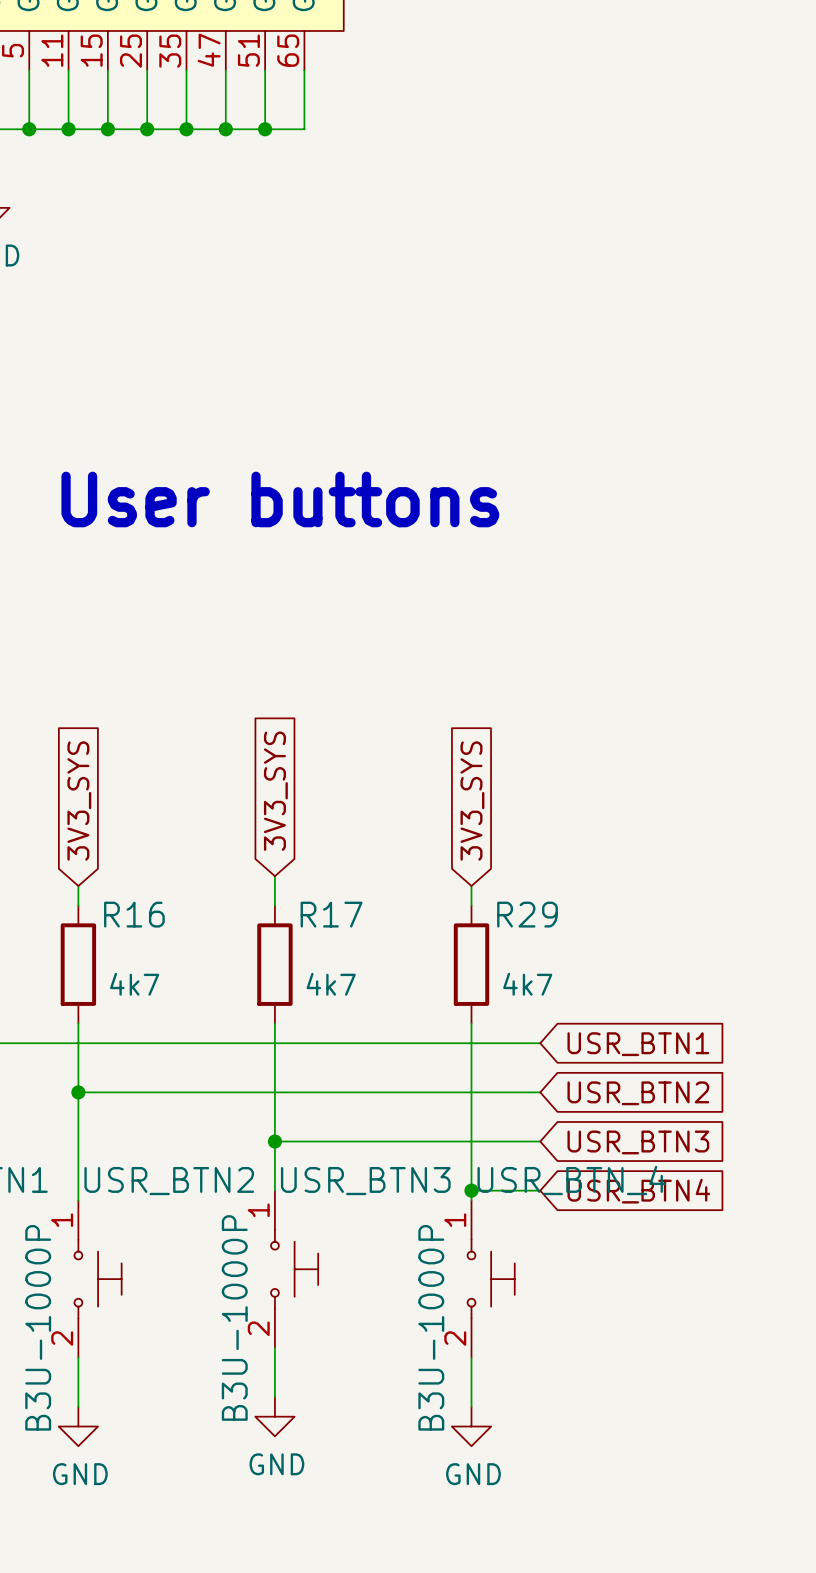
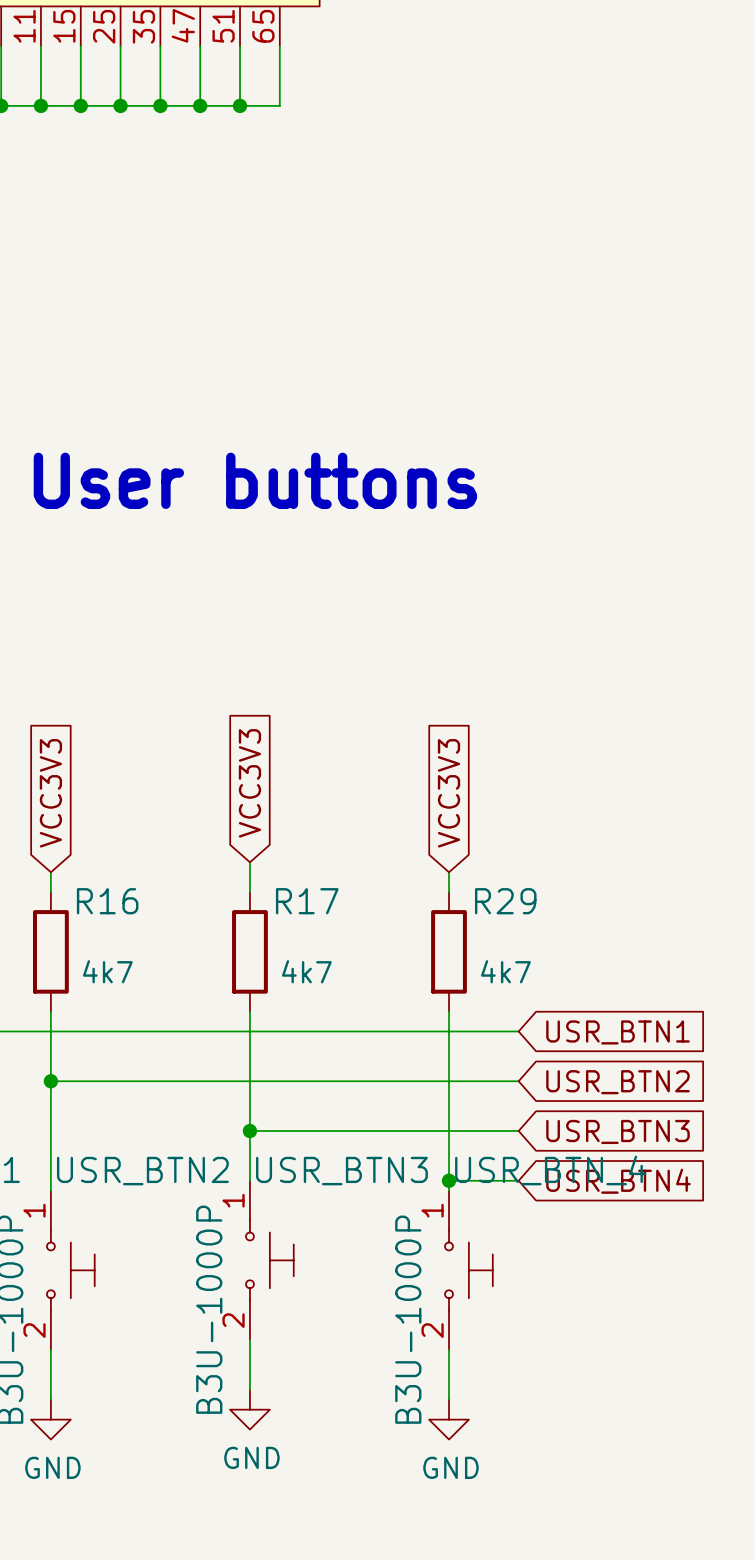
global label: 3V3_SYS (275, 791) -> VCC3V3 (249, 783)
global label: 3V3_SYS (79, 801) -> VCC3V3 (50, 793)
global label: 3V3_SYS (472, 801) -> VCC3V3 (449, 793)

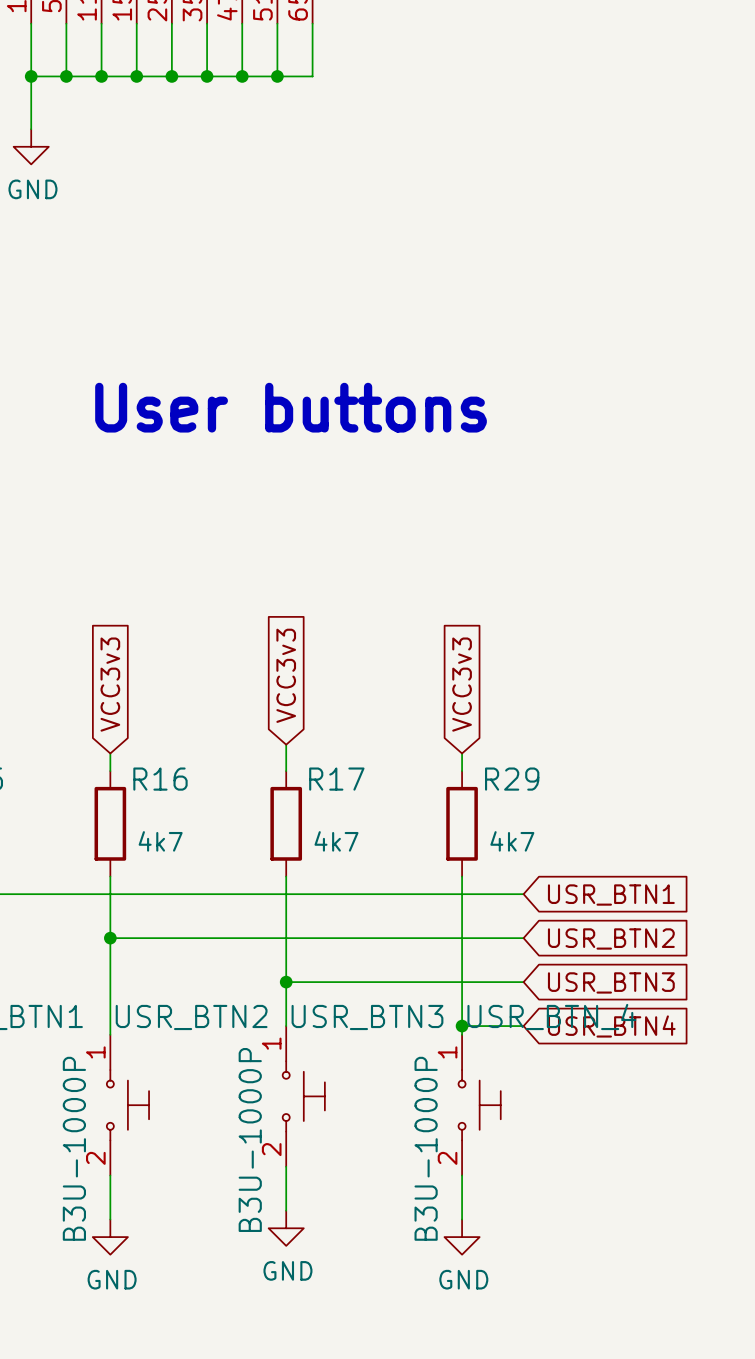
global label: VCC3V3 (249, 783) -> VCC3v3 (286, 675)
global label: VCC3V3 (50, 793) -> VCC3v3 (110, 684)
global label: VCC3V3 (449, 793) -> VCC3v3 (462, 684)

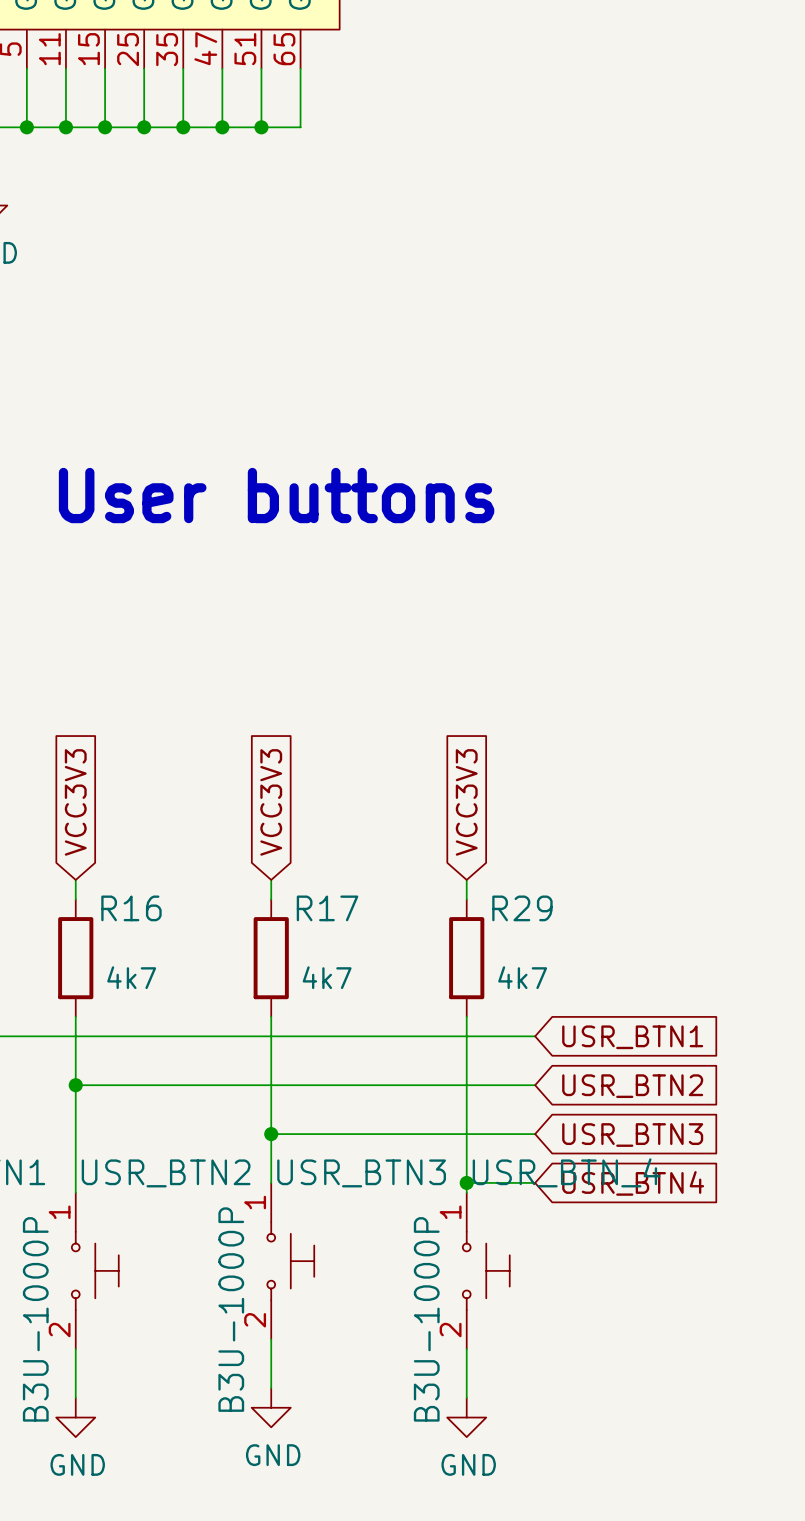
global label: VCC3v3 (286, 675) -> VCC3V3 (271, 802)
global label: VCC3v3 (110, 684) -> VCC3V3 (75, 802)
global label: VCC3v3 (462, 684) -> VCC3V3 (466, 802)
wire: (286, 744) (286, 753) -> none

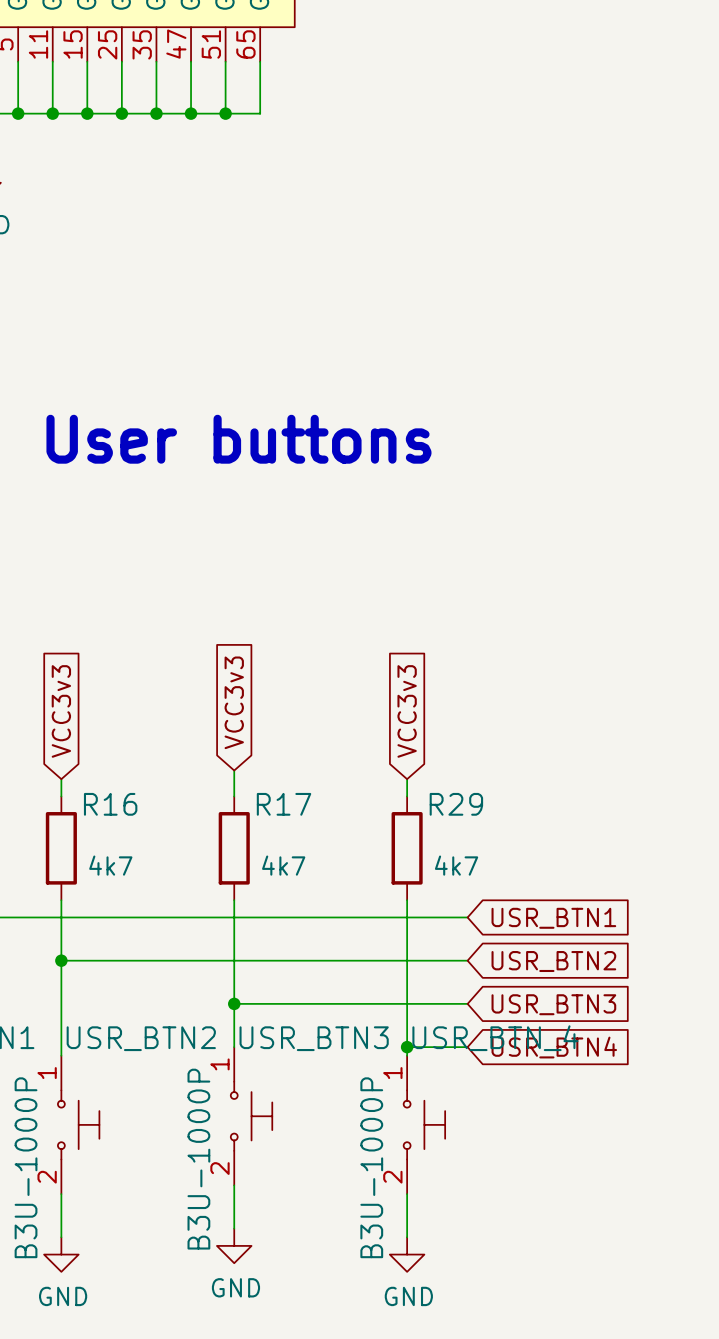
global label: VCC3V3 (75, 802) -> VCC3v3 (61, 711)
global label: VCC3V3 (271, 802) -> VCC3v3 (234, 702)
global label: VCC3V3 (466, 802) -> VCC3v3 (407, 711)
wire: none -> (234, 770) (234, 779)

